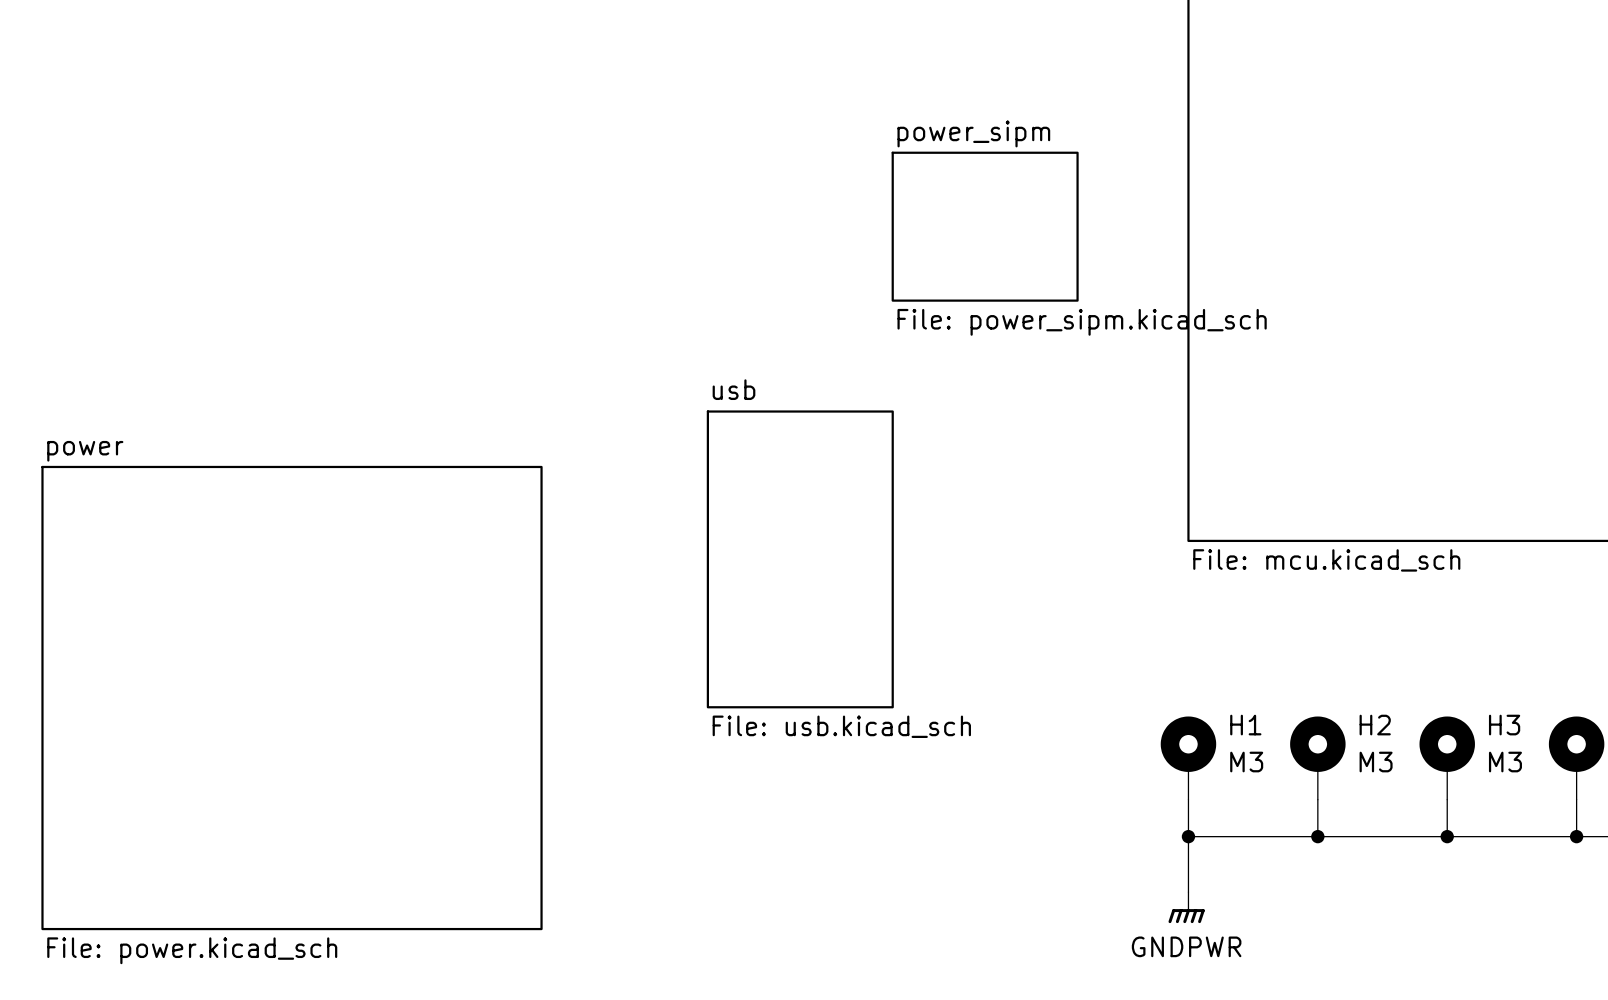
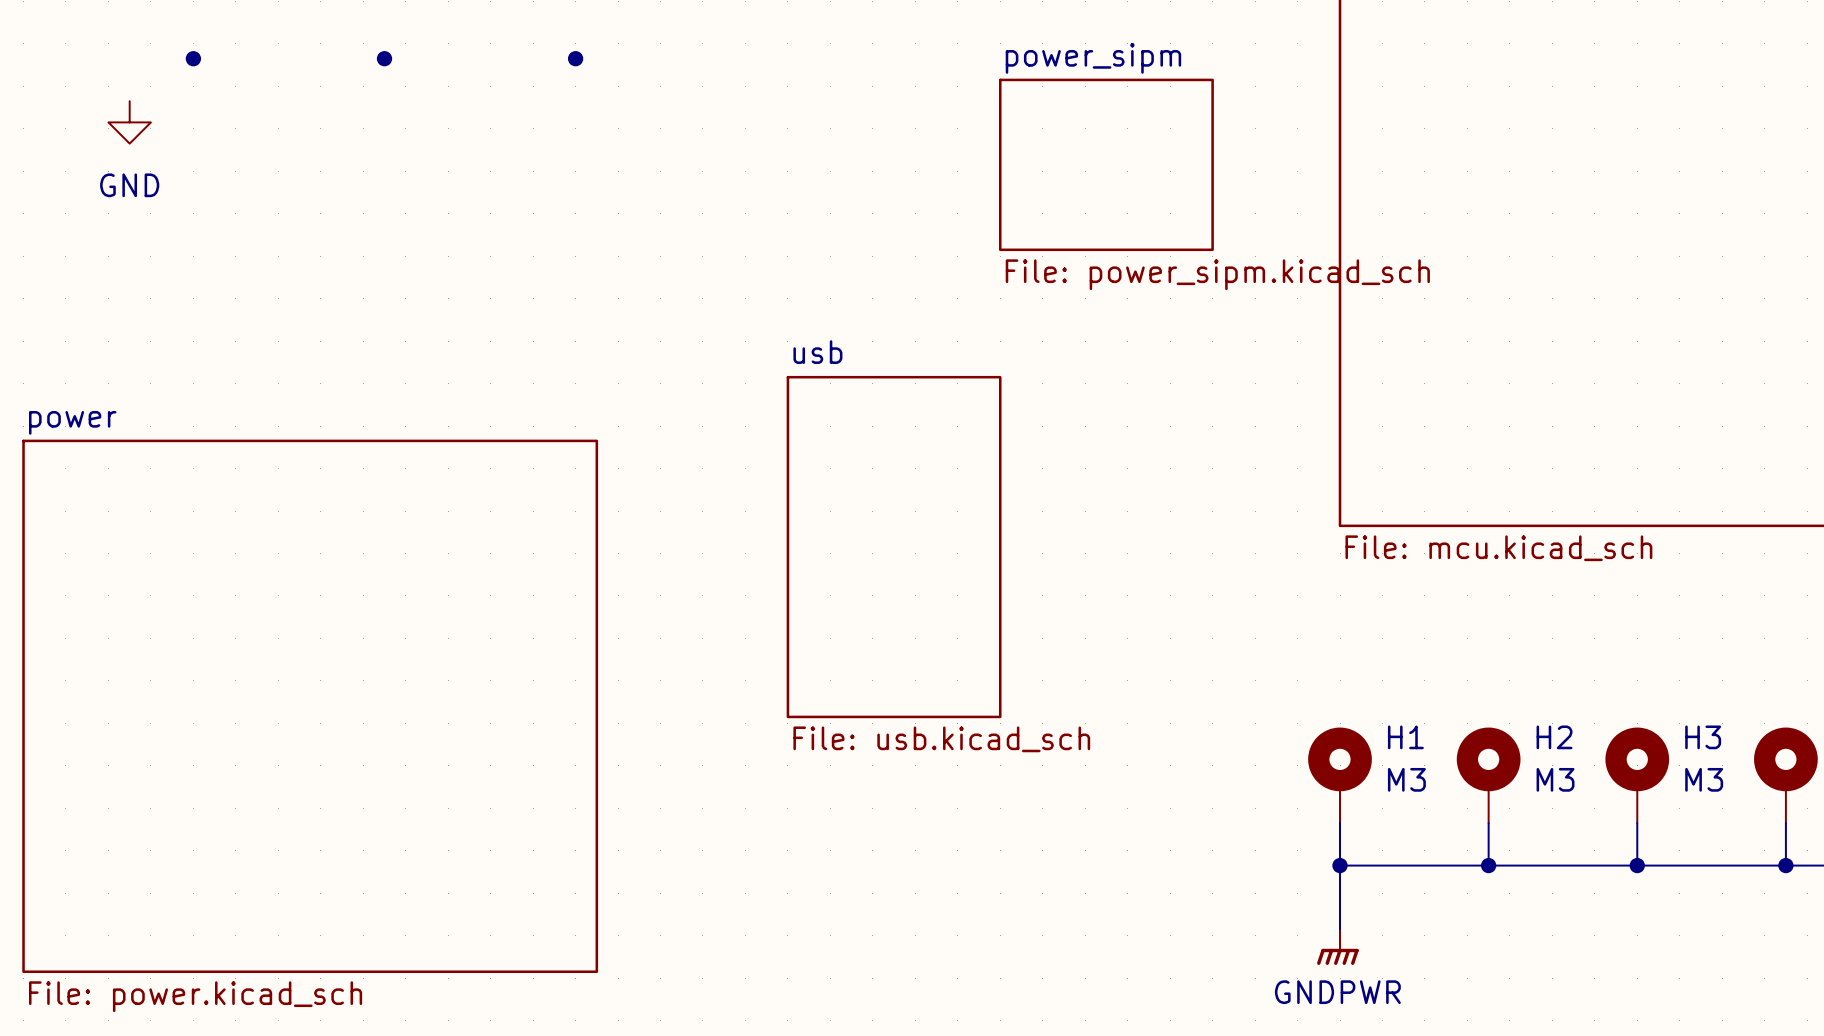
junction: none -> (193, 58)
junction: none -> (384, 58)
junction: none -> (575, 58)
power symbol: none -> GND (129, 122)

